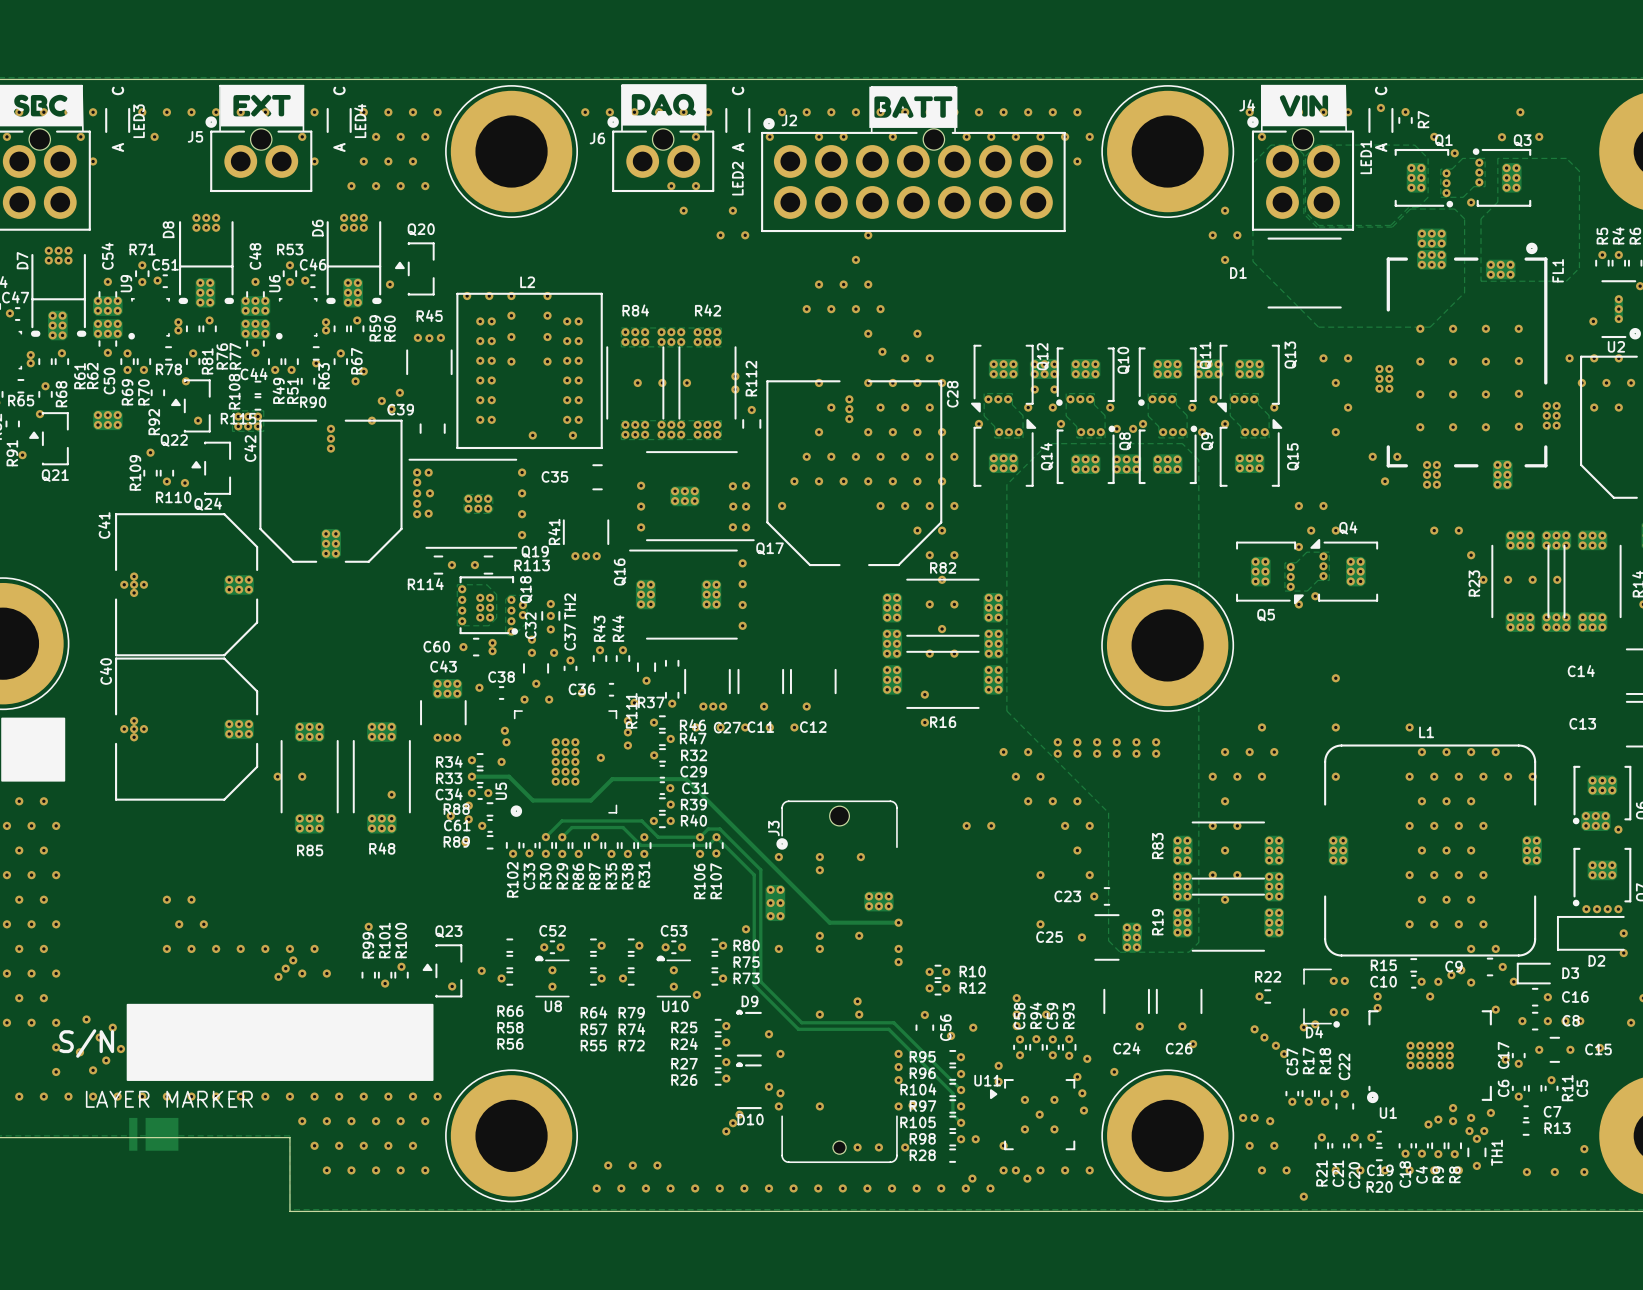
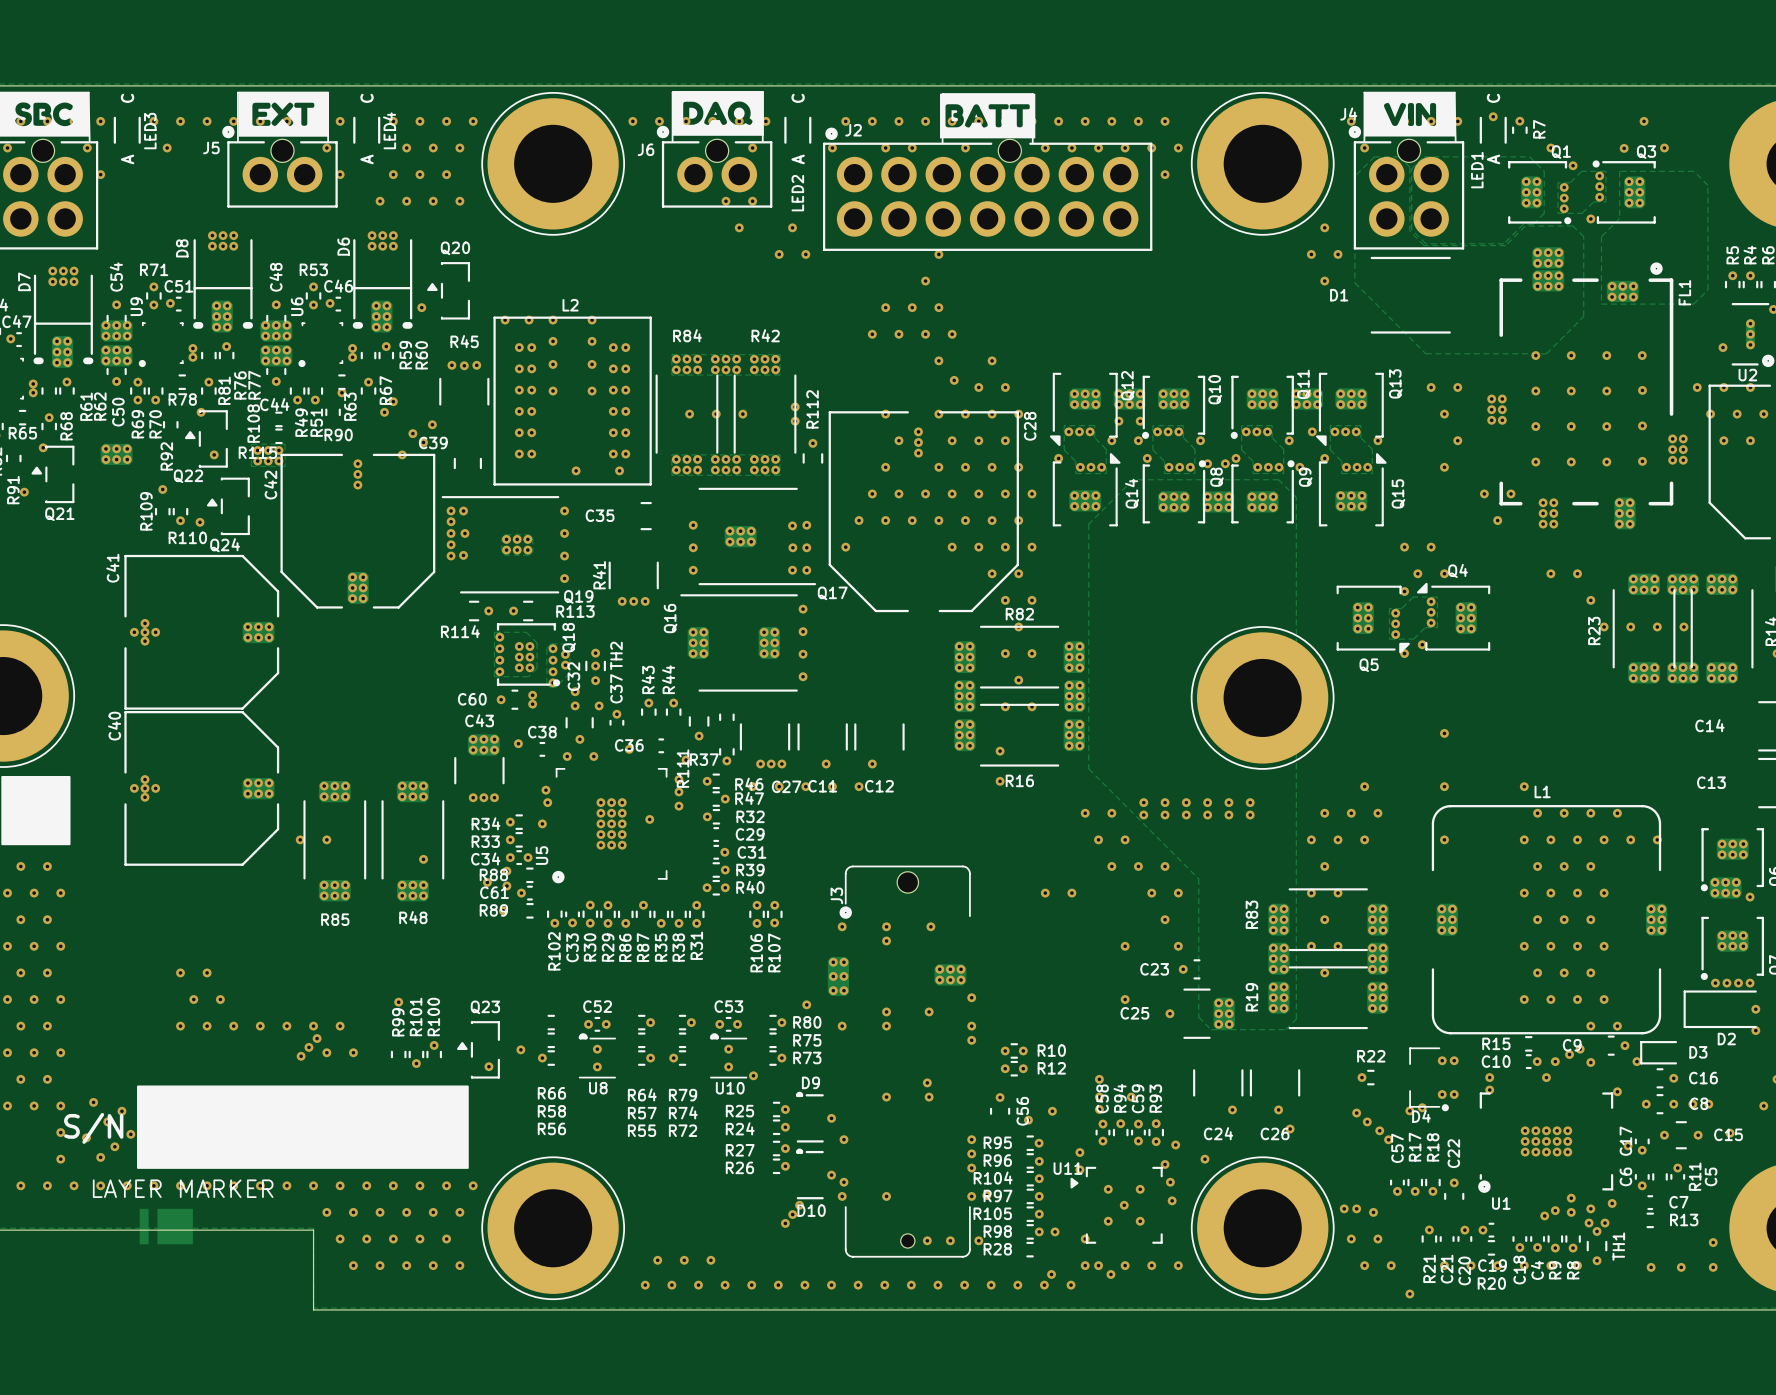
track: (471, 776) (509, 776) (532, 800) (591, 800) (612, 779) (686, 779) (829, 922) (898, 922) -> none
track: (545, 837) (561, 820) (641, 820) (658, 837) (700, 837) (708, 829) (719, 829) (760, 869) (760, 981) (801, 1022) (893, 1022) (961, 1090) -> none
track: (562, 837) (571, 827) (623, 827) (640, 845) (708, 845) (716, 837) (754, 874) (754, 985) (798, 1029) (888, 1029) (952, 1093) (952, 1114) (961, 1122) -> none

